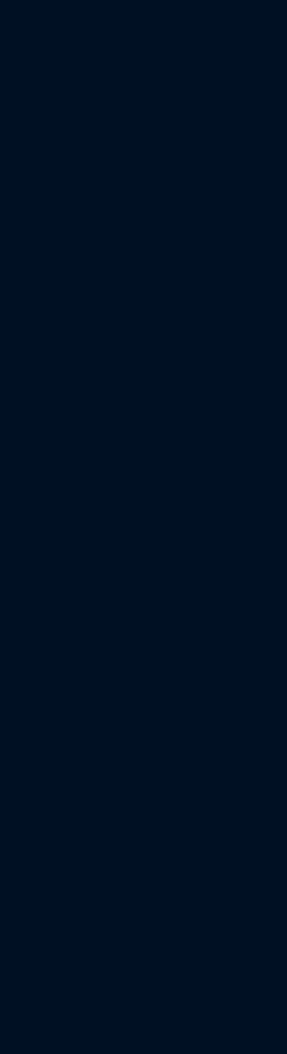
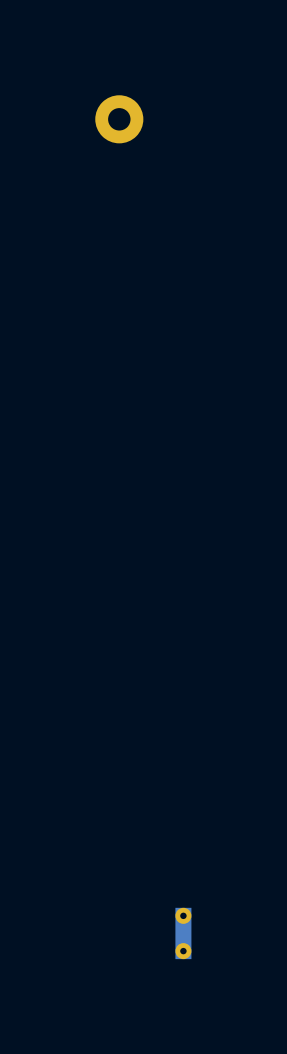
part: none -> (119, 119)
part: none -> (183, 933)

